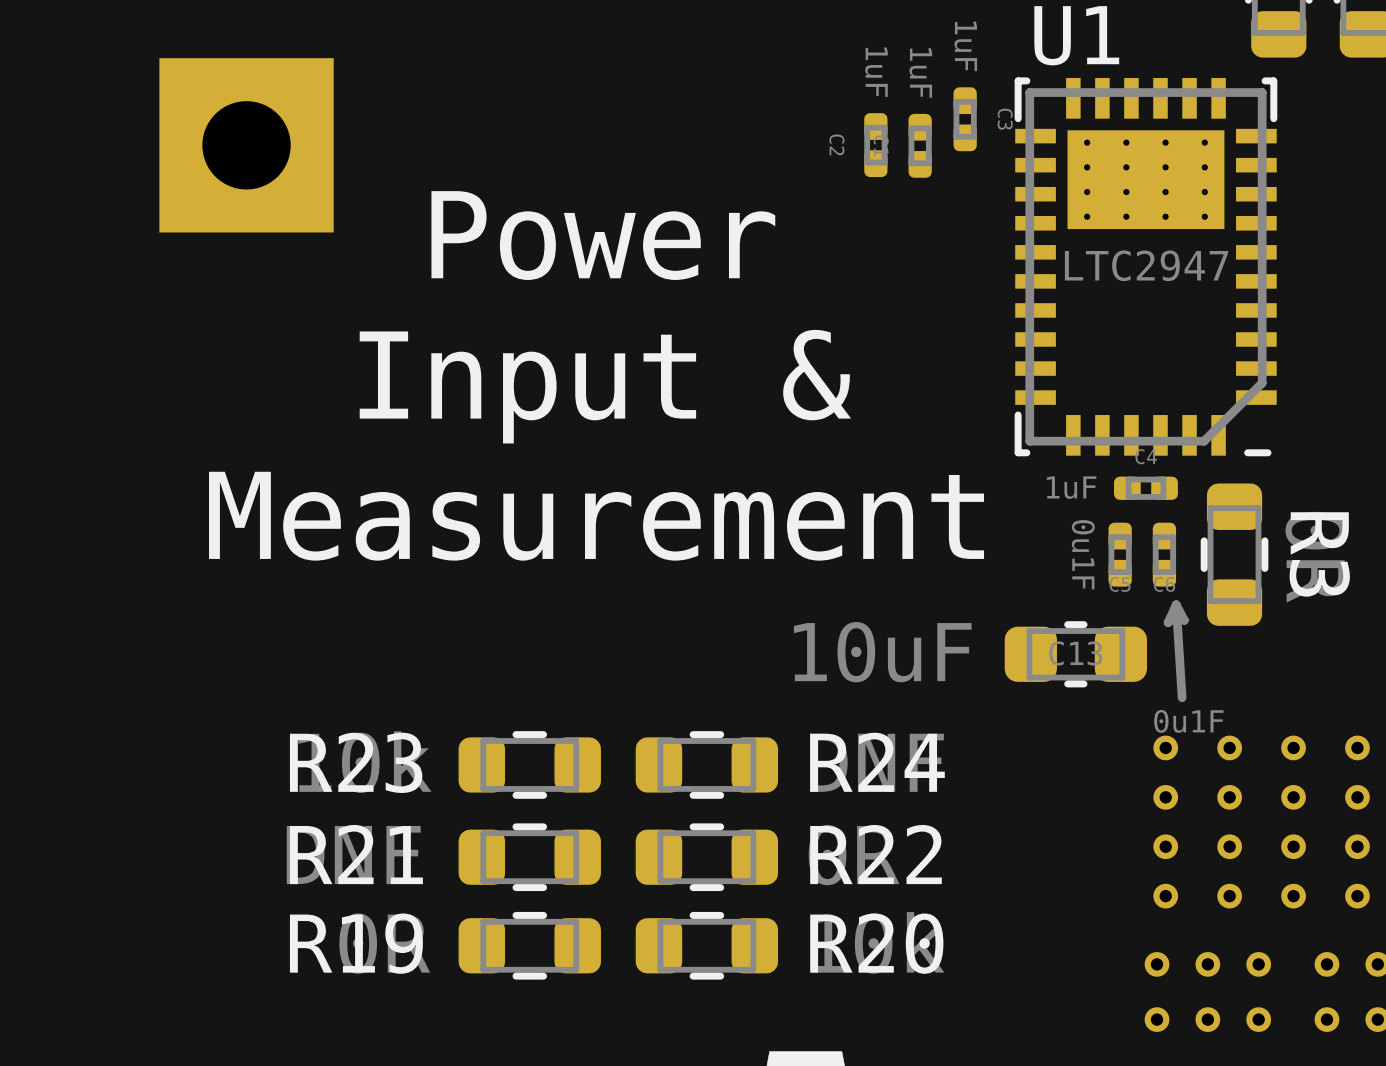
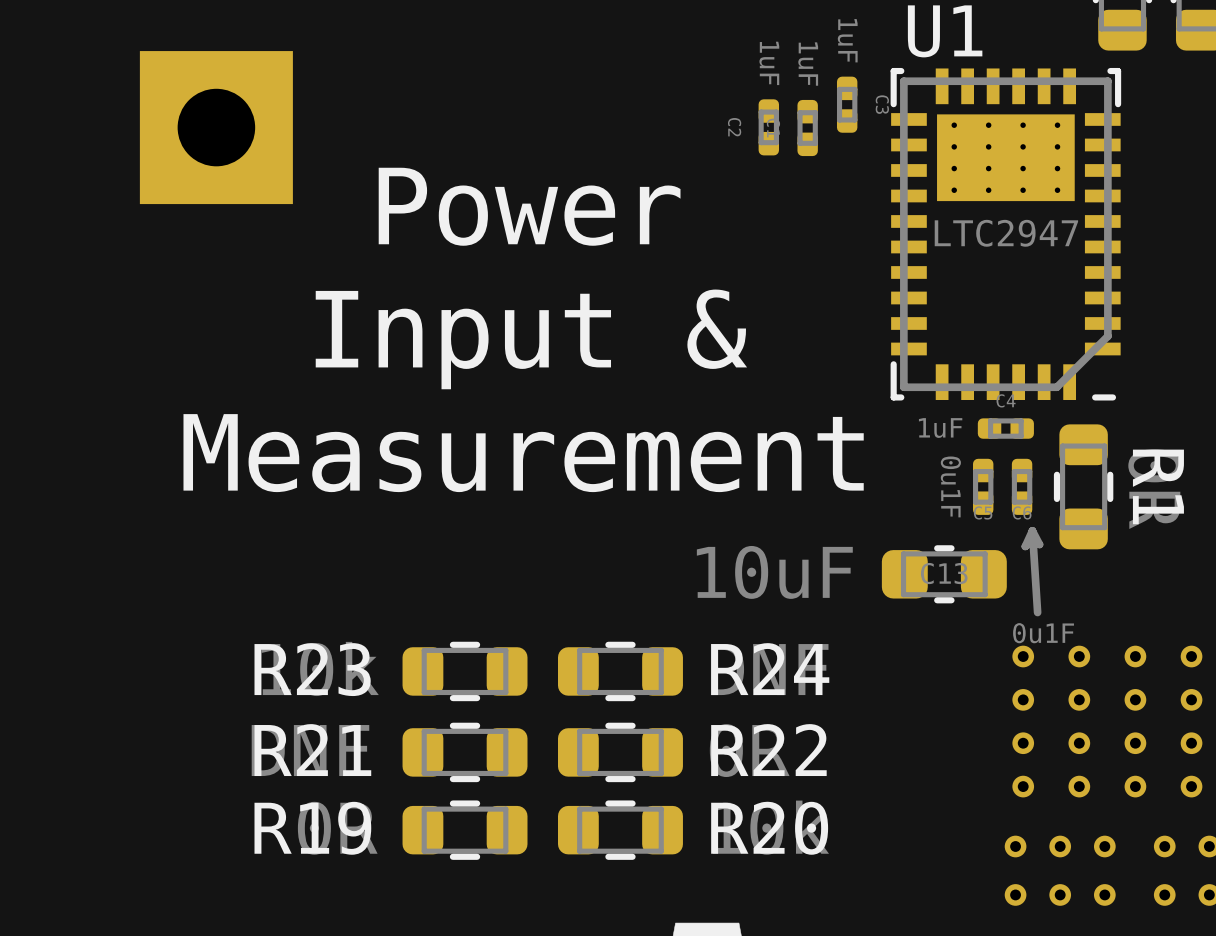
R3 name: R3 (1319, 554) -> R1 (1158, 486)

